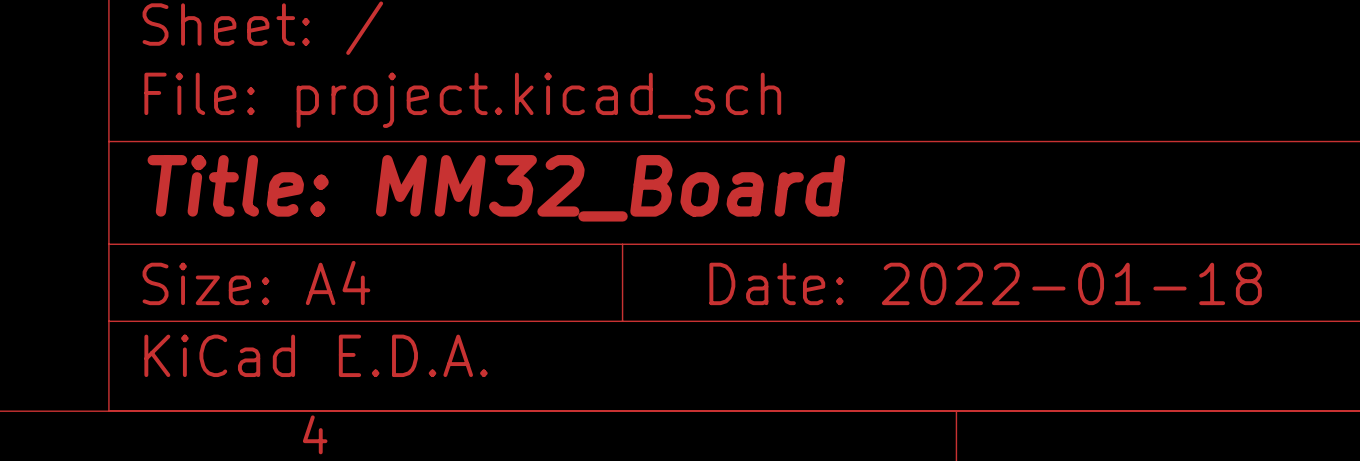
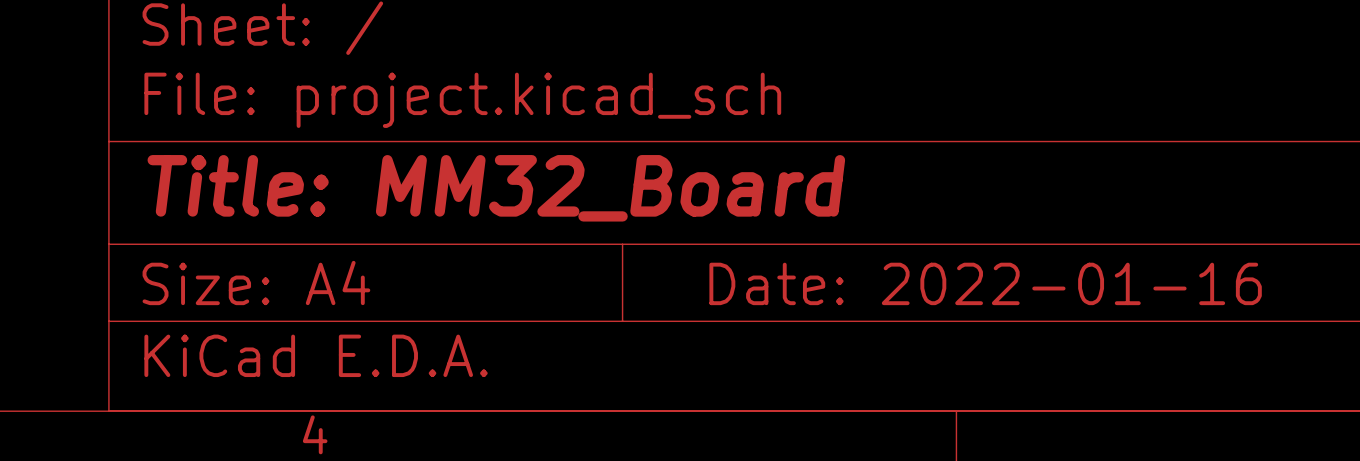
title block: Date: 2022-01-18 (985, 283) -> Date: 2022-01-16 (985, 283)

